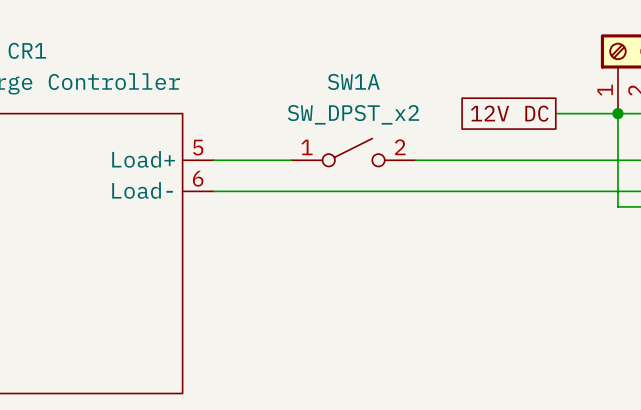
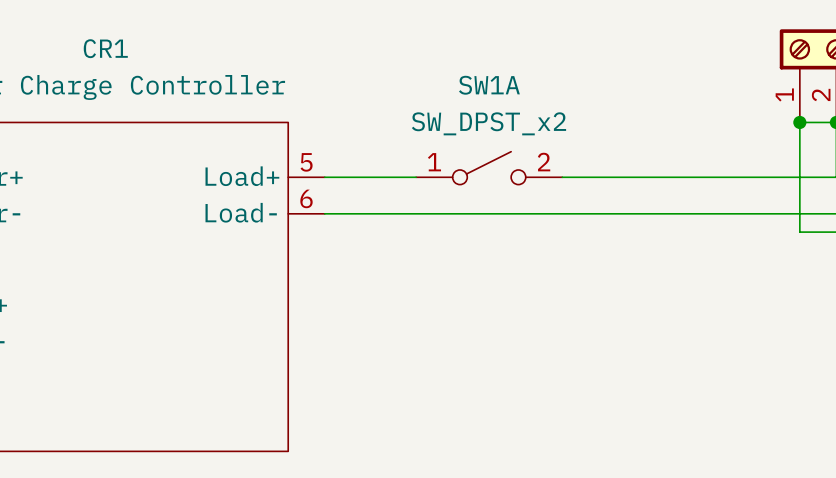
global label: 12V DC (509, 113) -> none
wire: (555, 113) (617, 113) -> none

